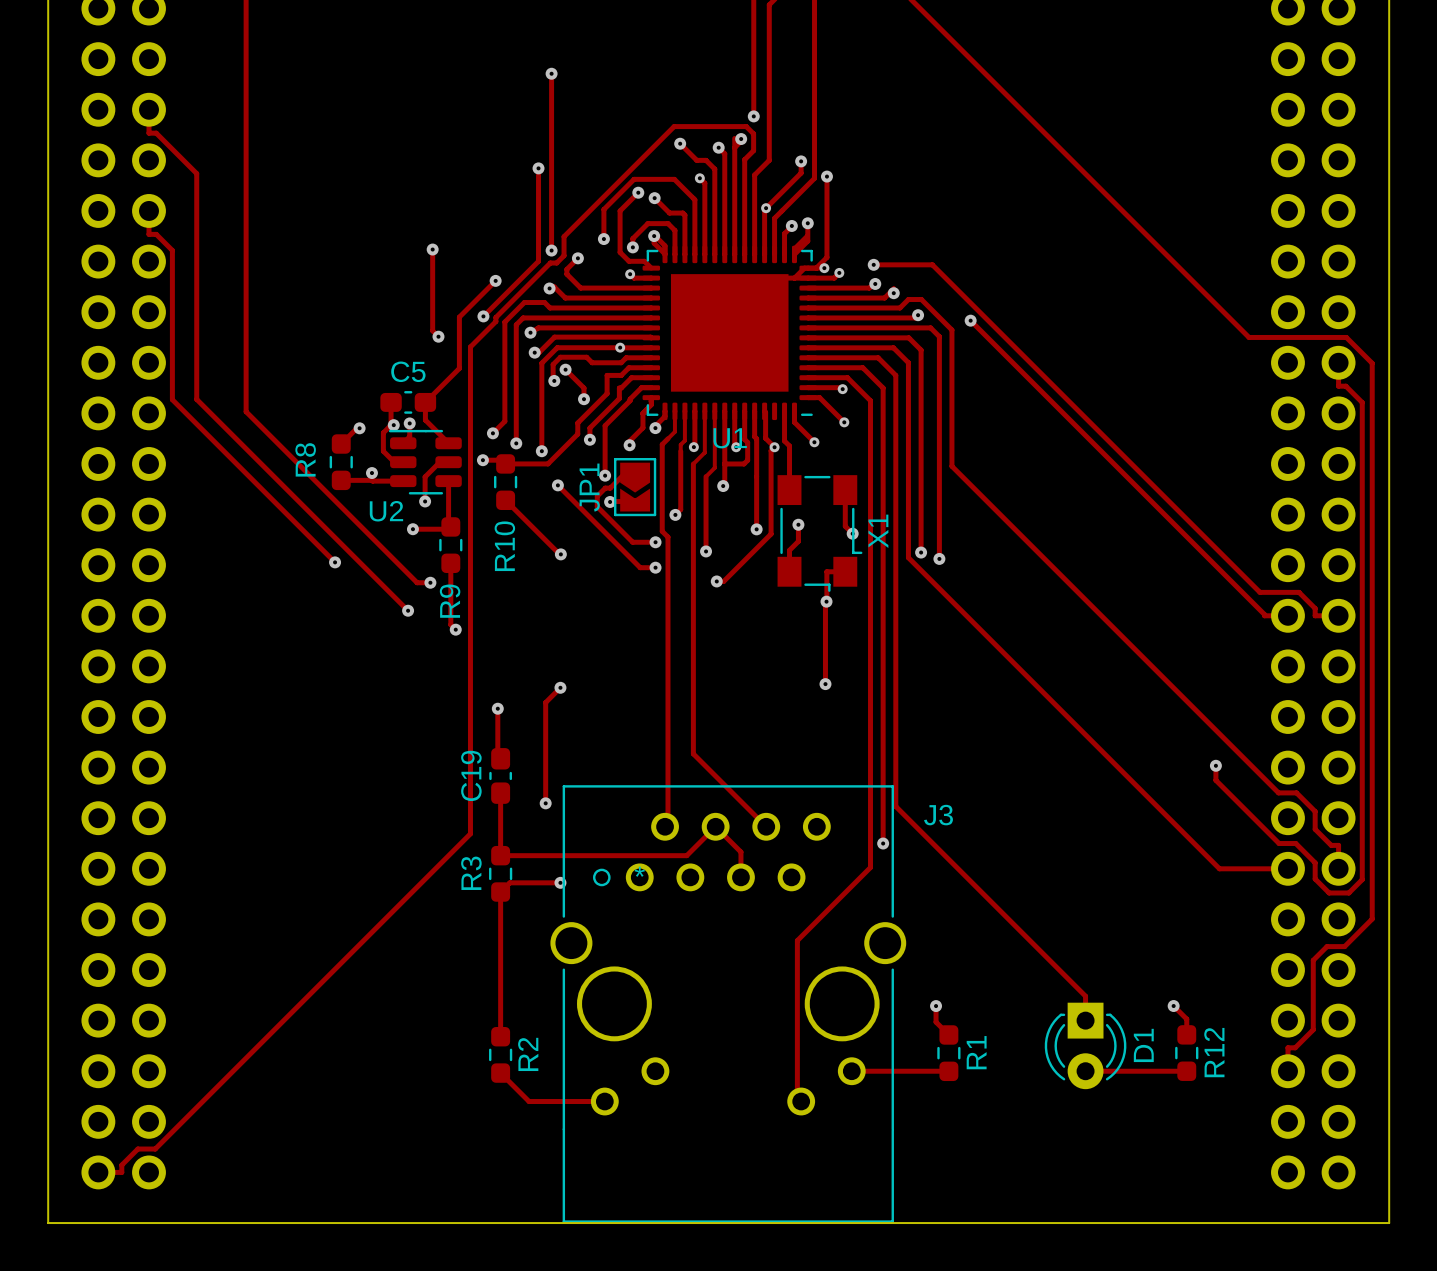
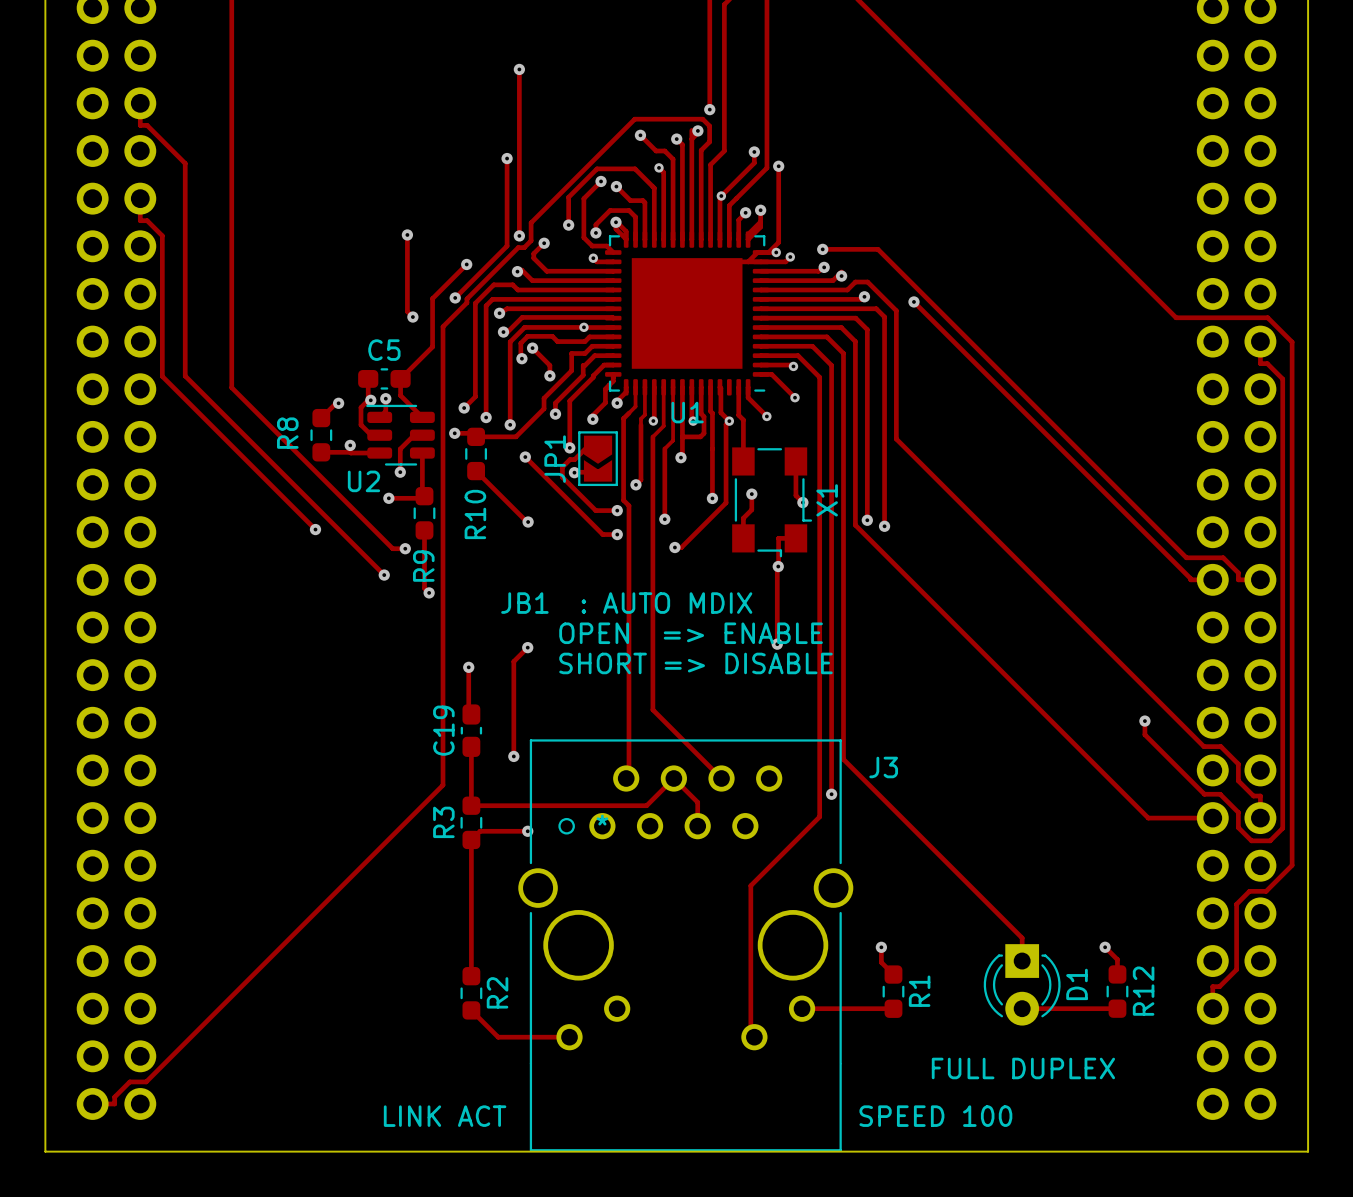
text: none -> JB1 : AUTO MDIX (626, 603)
text: none -> OPEN => ENABLE (691, 633)
text: none -> SHORT => DISABLE (695, 663)
text: none -> FULL DUPLEX (1023, 1068)
text: none -> LINK ACT (445, 1116)
text: none -> SPEED 100 (935, 1116)

